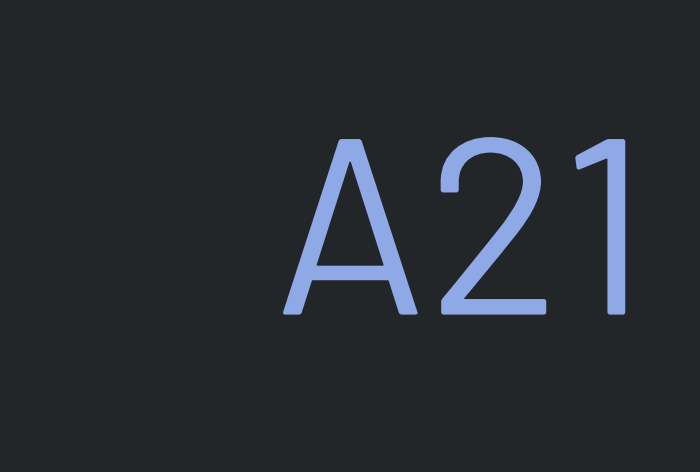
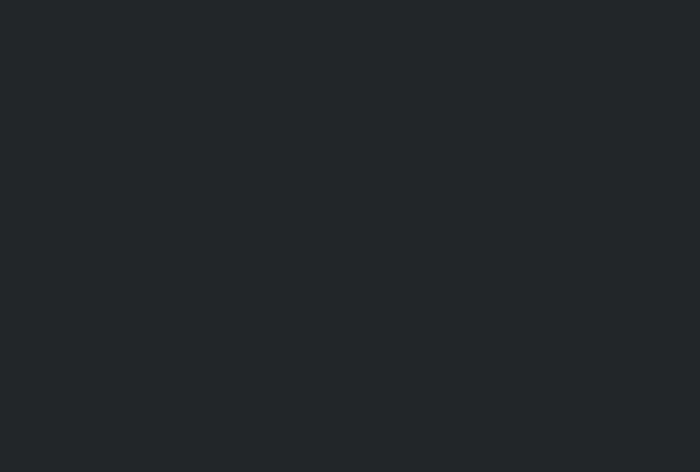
text: A21 (453, 225) -> none

